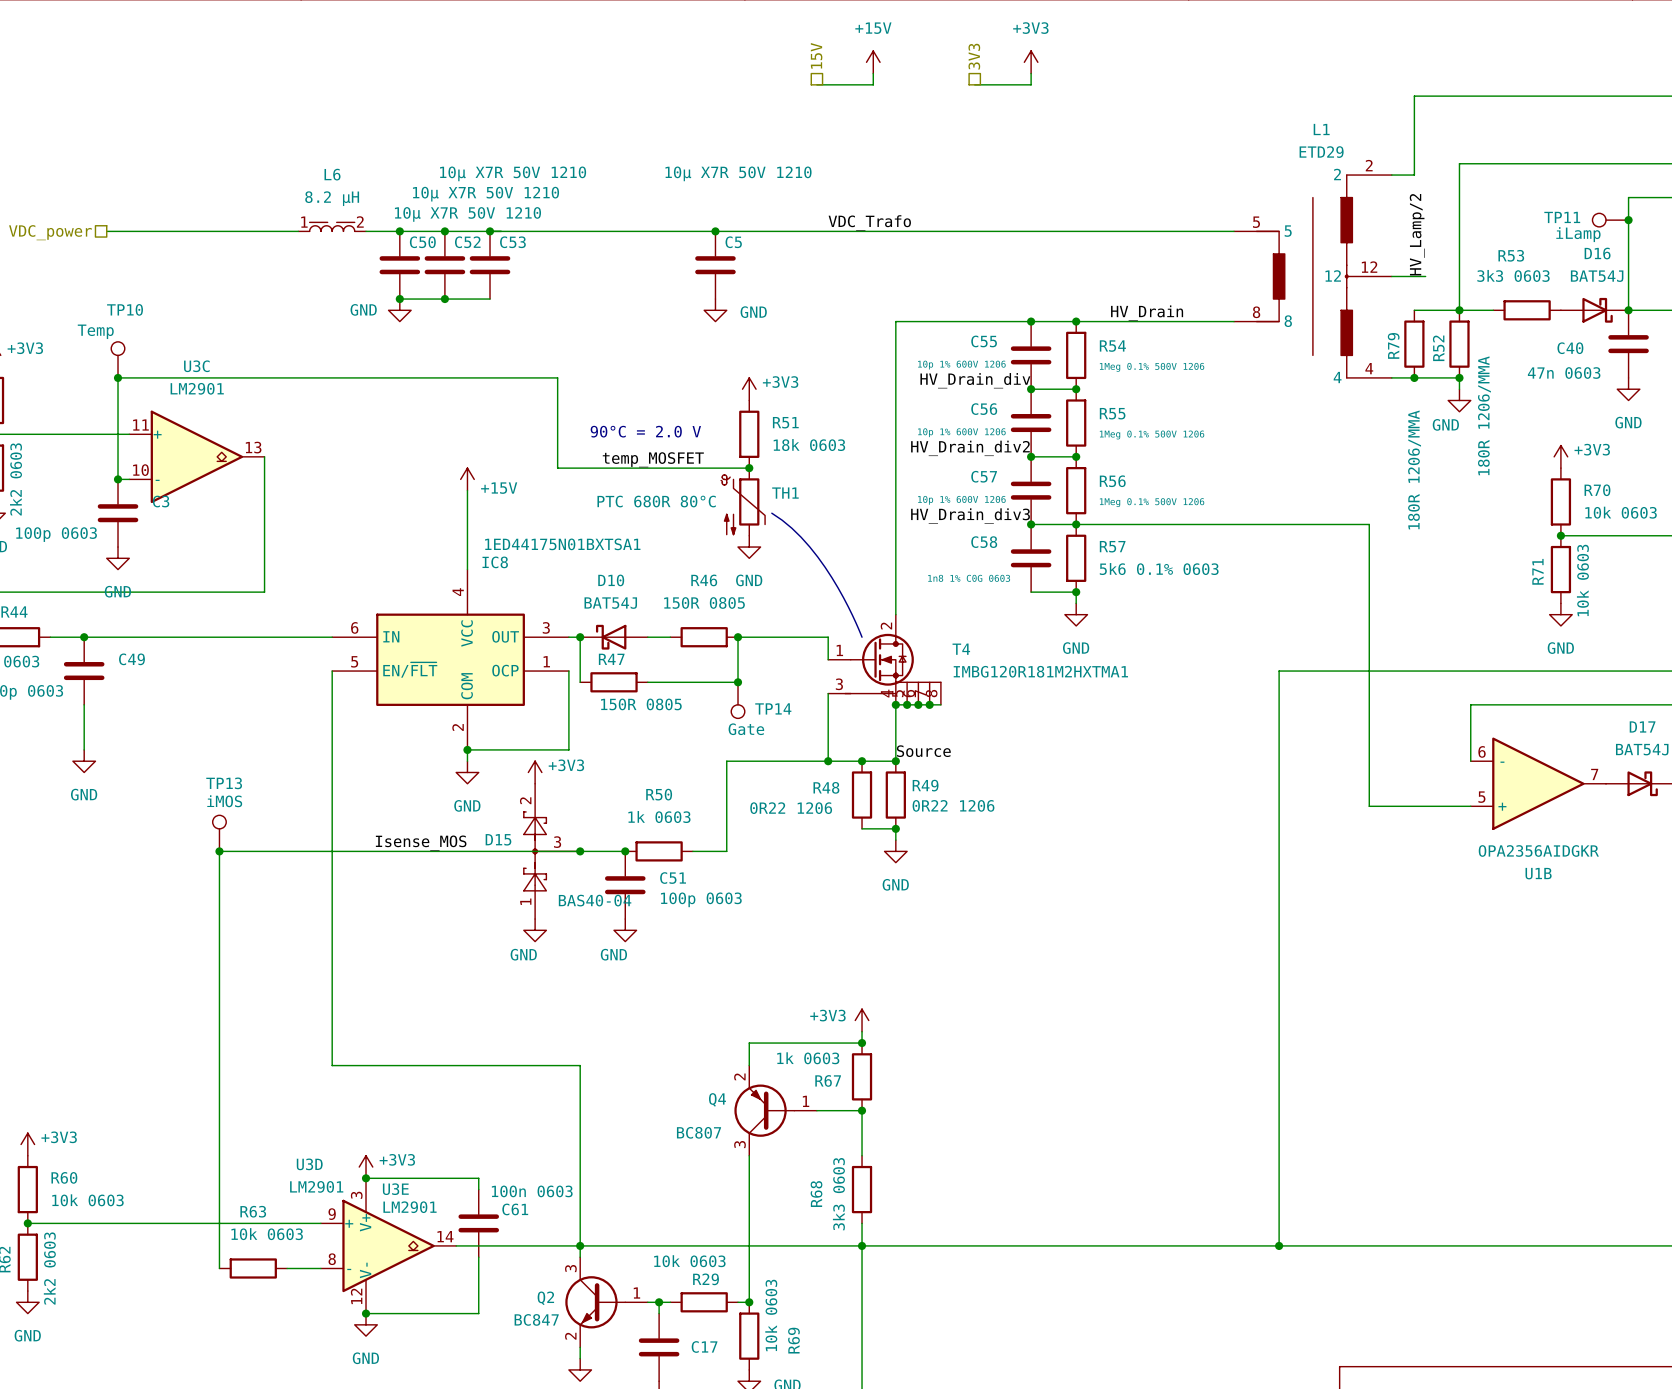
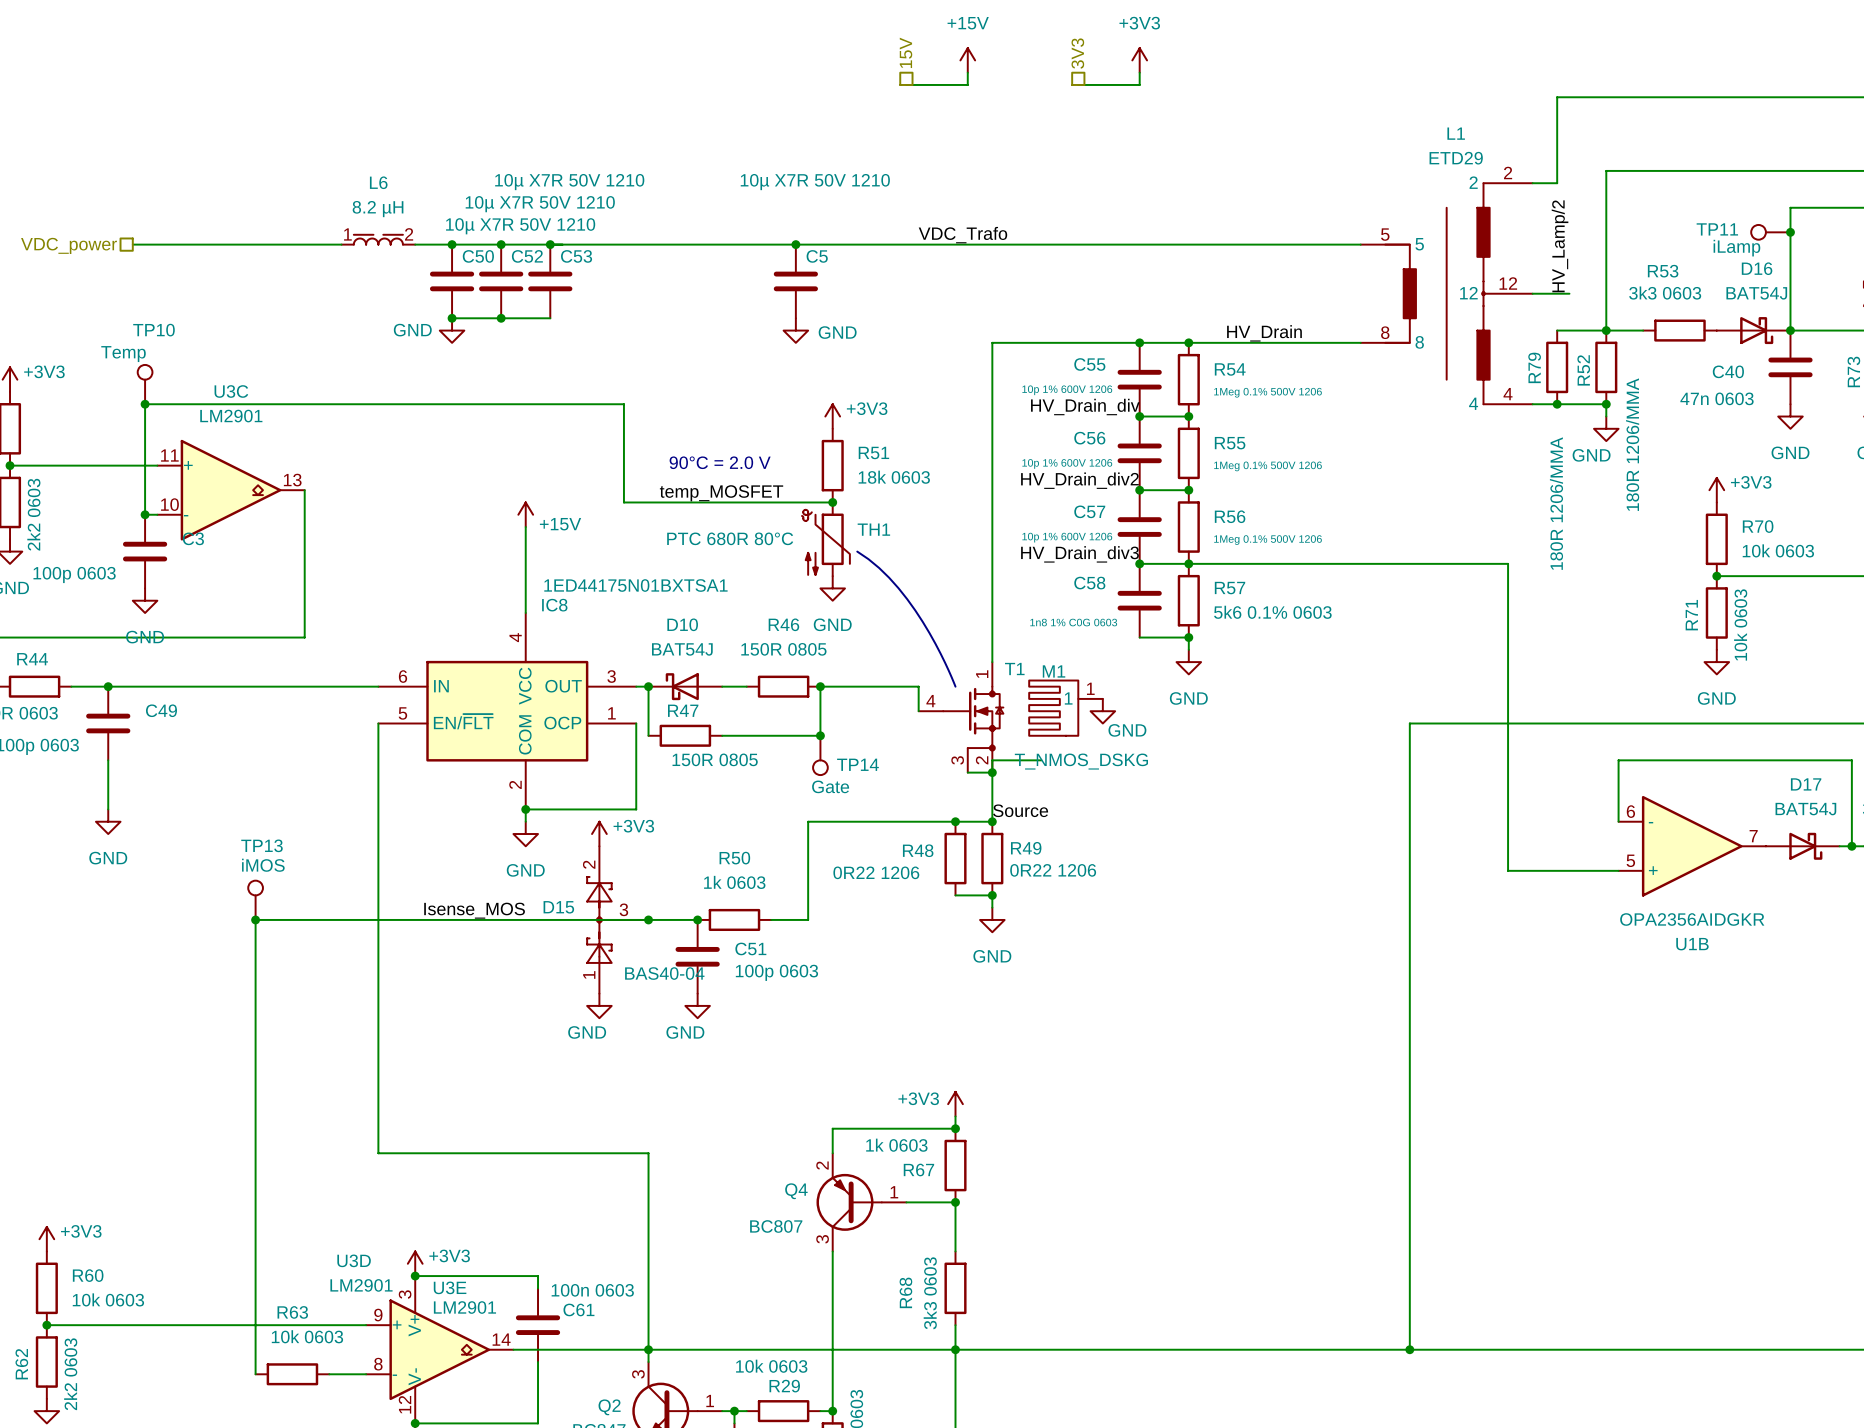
M1: none -> (1066, 708)
T4: IMBG120R181M2HXTMA1 (884, 659) -> none
power symbol: none -> GND (1102, 711)
T1: none -> T_NMOS_DSKG (961, 717)
wire: (828, 693) (828, 761) -> none
junction: (895, 704) -> none
junction: (907, 704) -> none
junction: (918, 704) -> none
junction: (929, 704) -> none
wire: none -> (967, 772) (992, 772)
junction: none -> (992, 772)
junction: (828, 761) -> none

